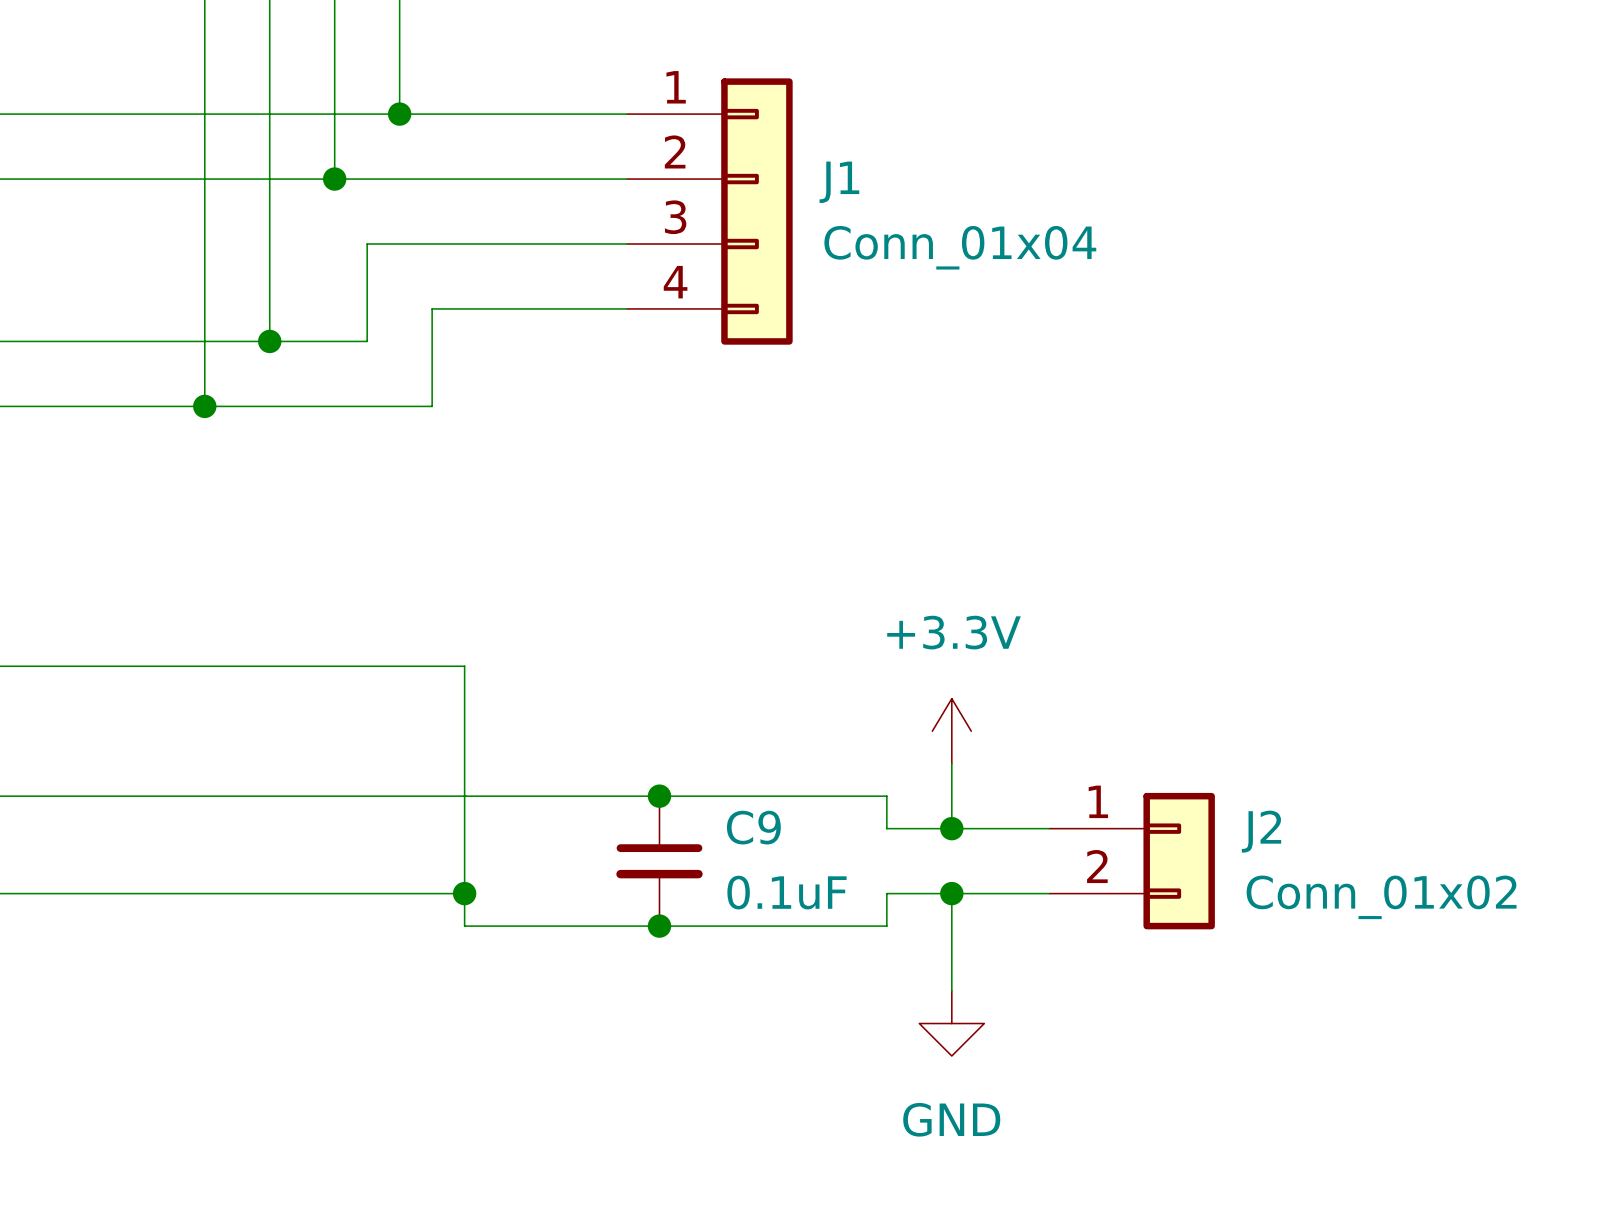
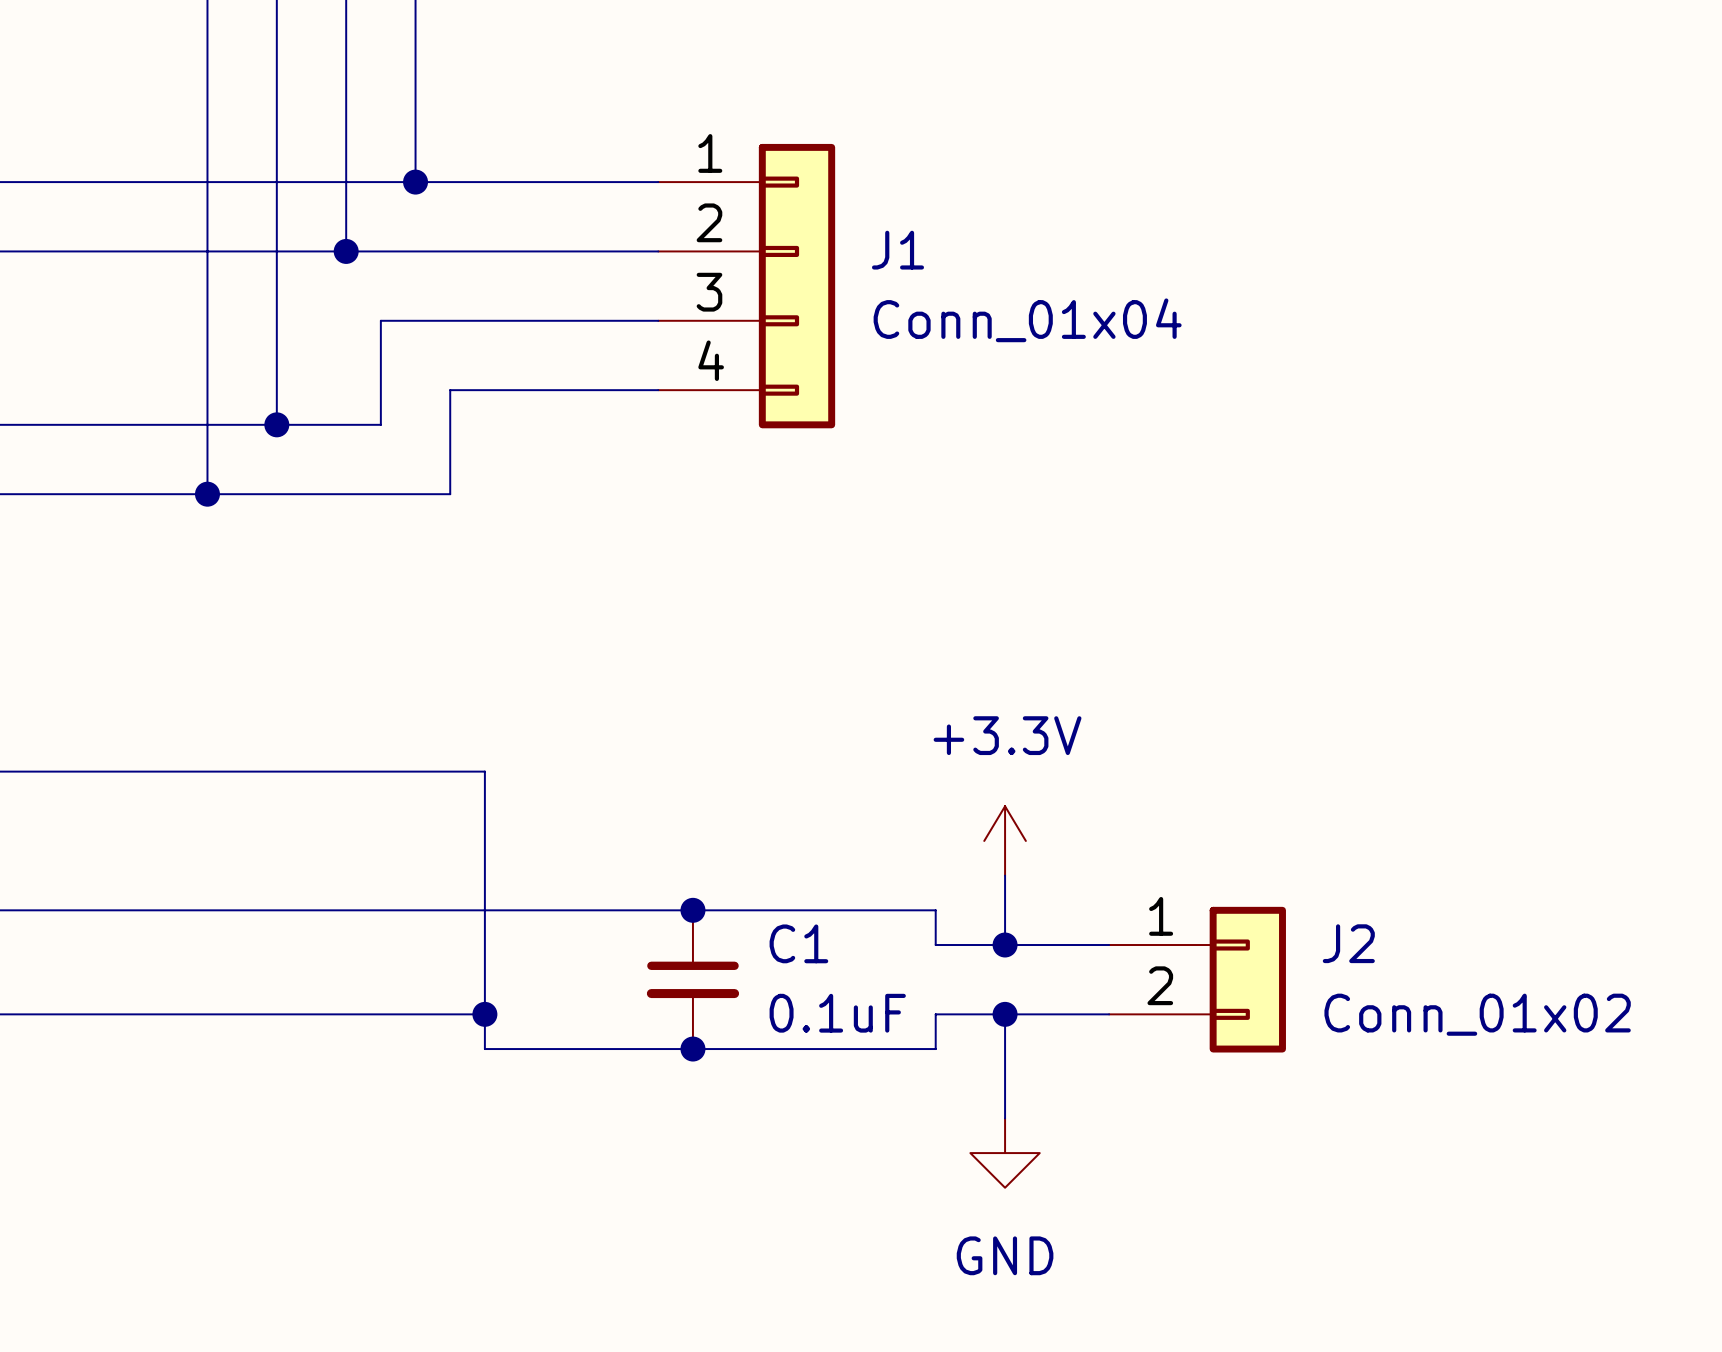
C9 name: C9 (753, 827) -> C1 (798, 943)

